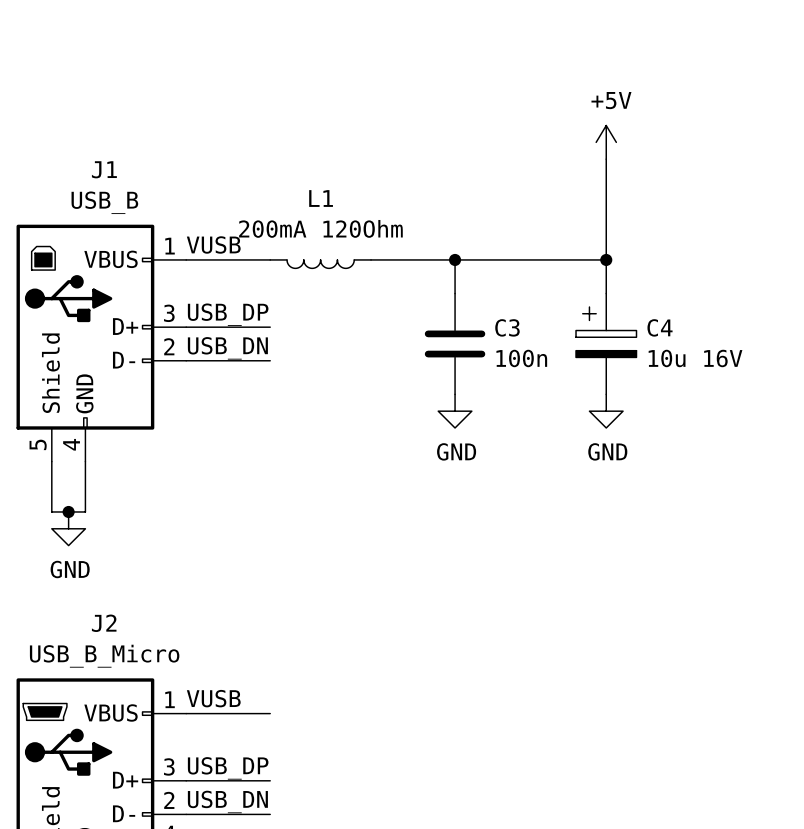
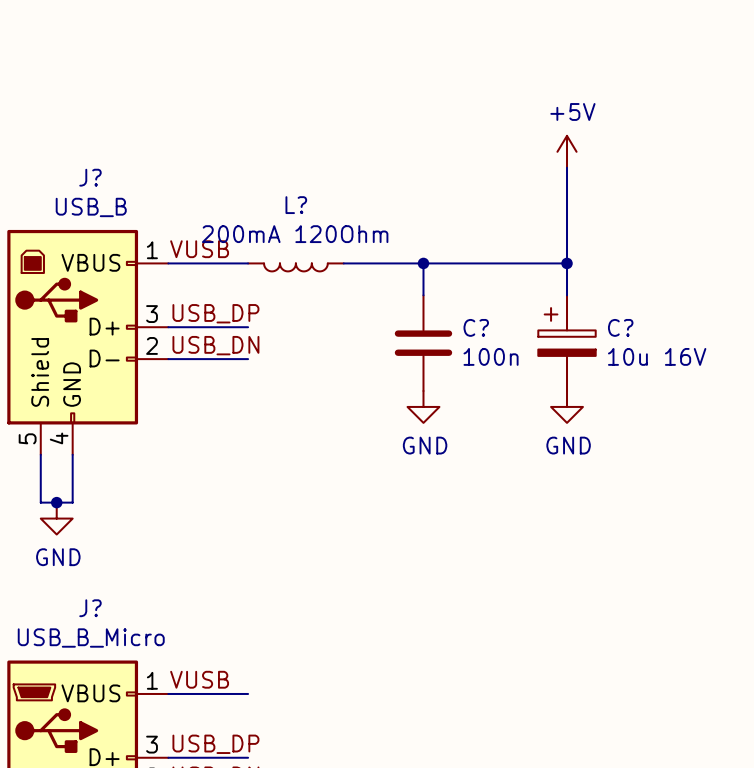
J1 name: J1 (104, 169) -> J? (90, 177)
L1 name: L1 (321, 198) -> L? (296, 205)
C3 name: C3 (507, 327) -> C? (476, 327)
C4 name: C4 (660, 327) -> C? (620, 327)
J2 name: J2 (104, 623) -> J? (90, 608)

